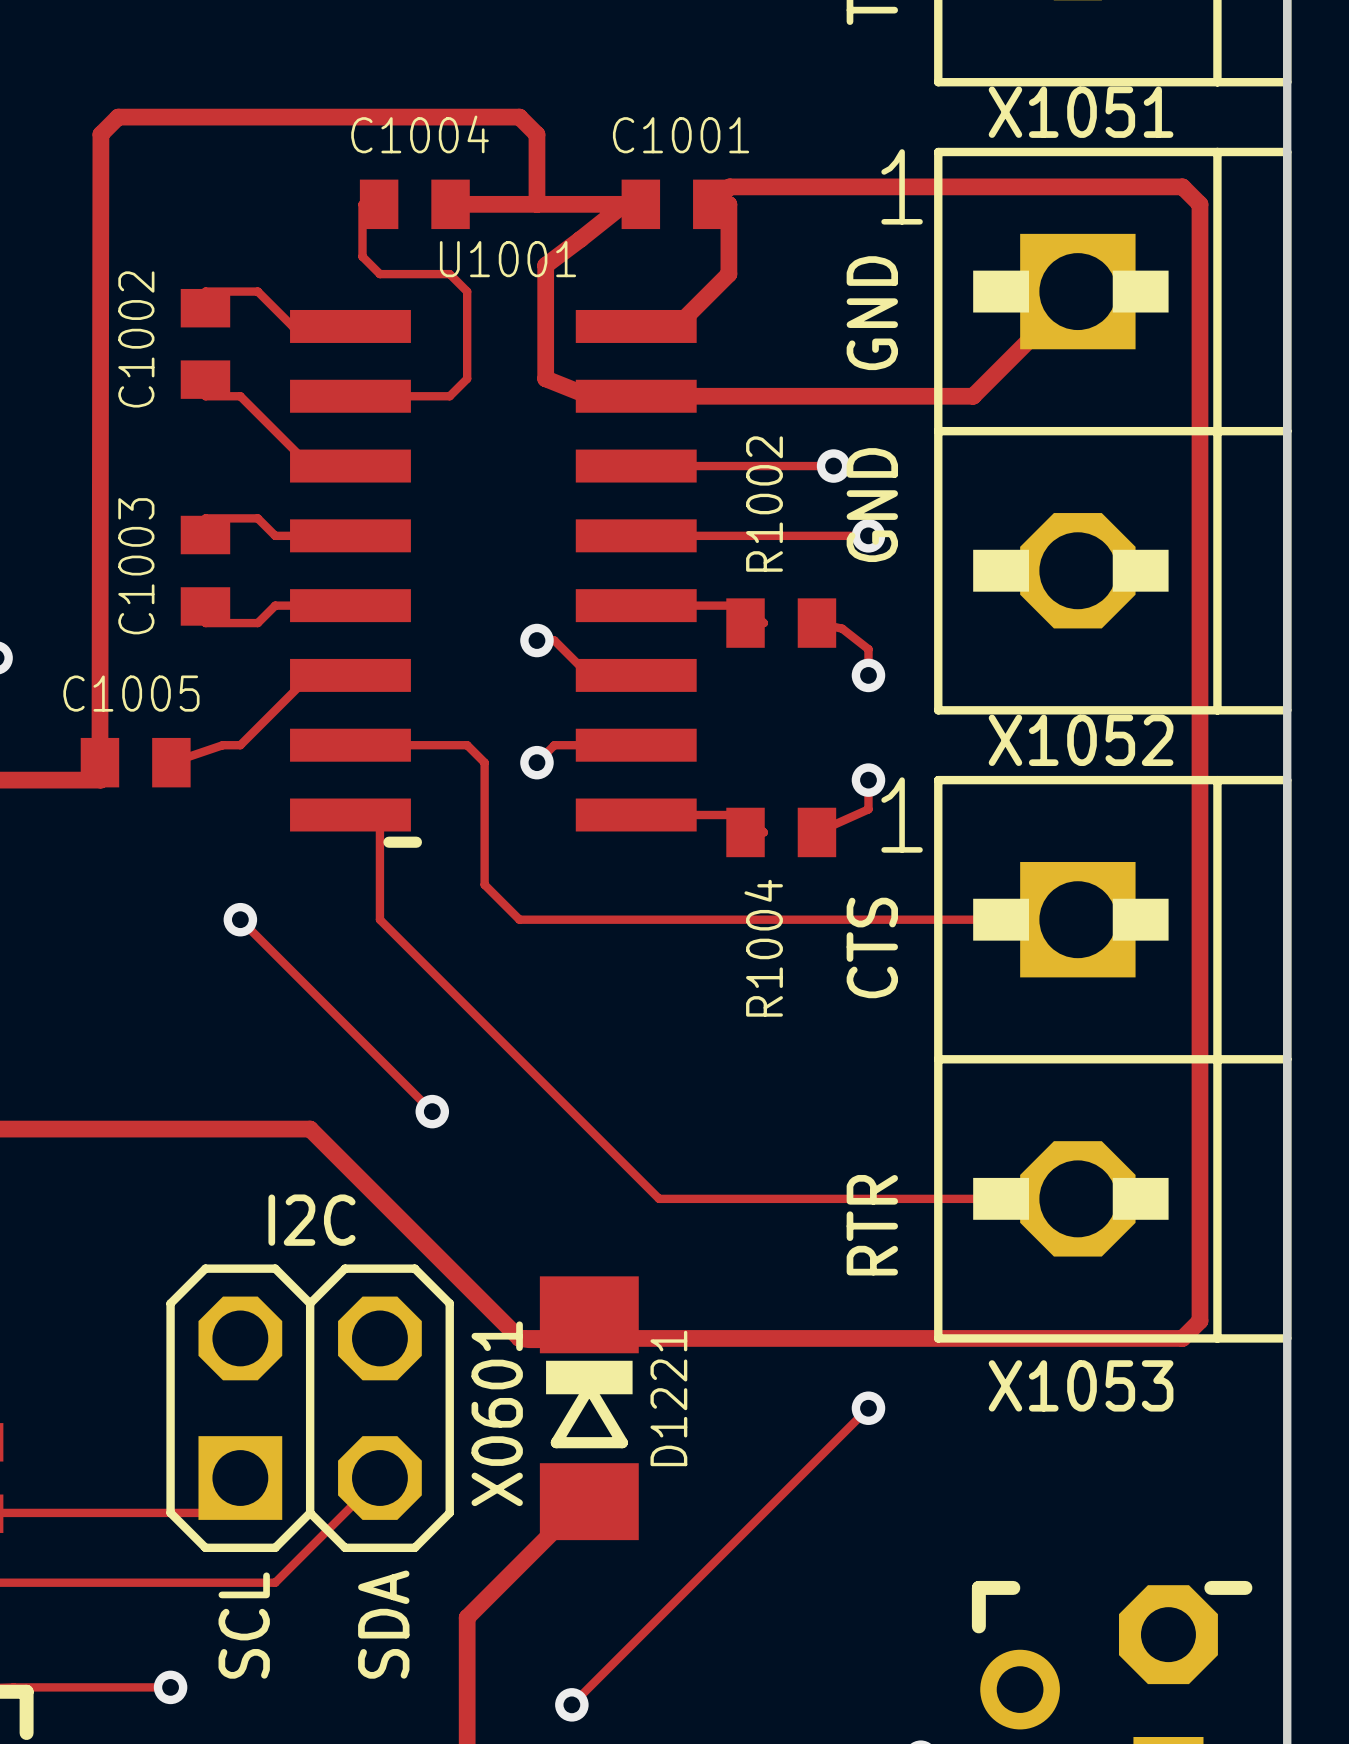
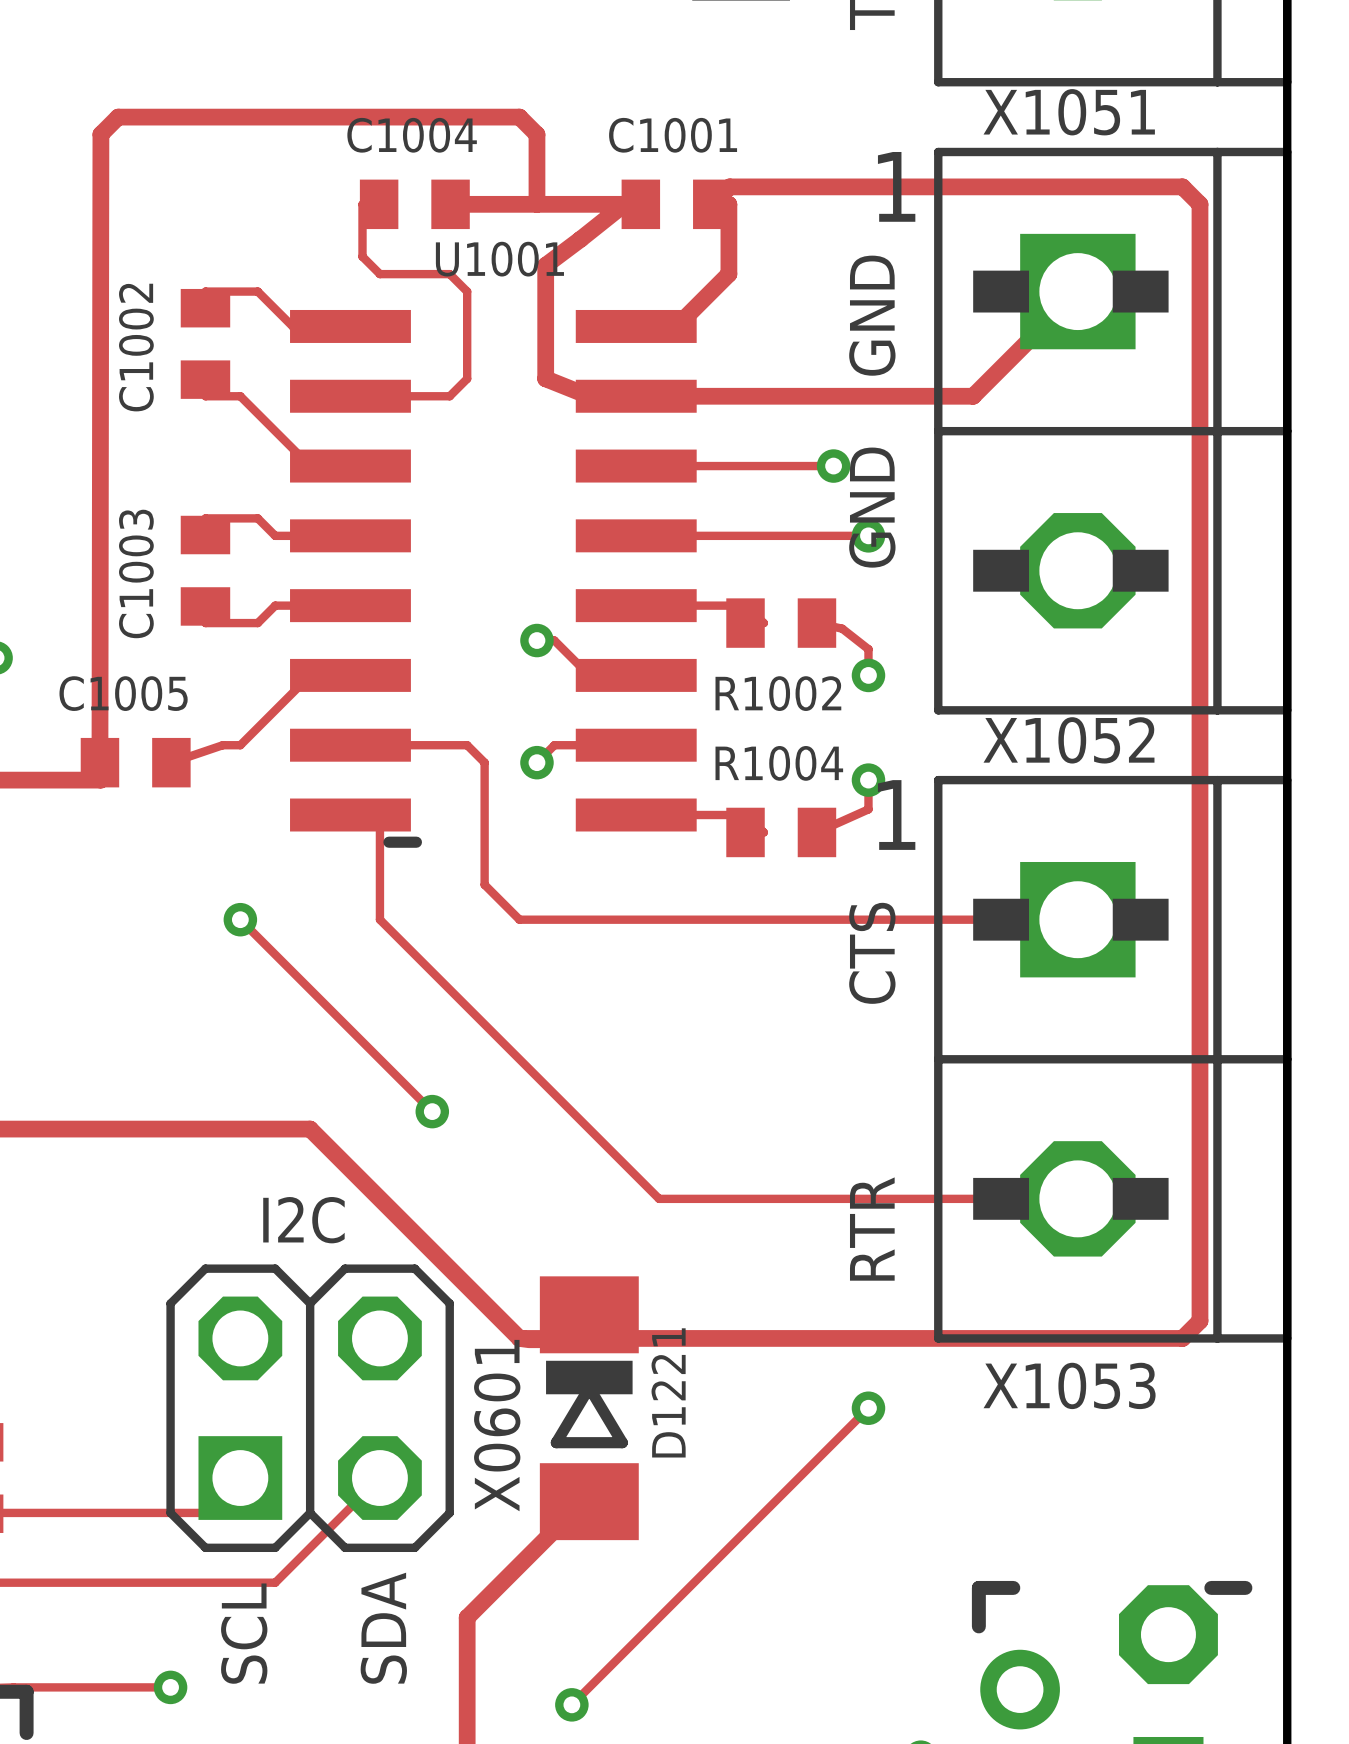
R1002 name rotation: 0° (764, 504) -> 90° clockwise (778, 693)
R1002 name position: R1002 (764, 504) -> R1002 (778, 693)
R1004 name rotation: 0° (763, 948) -> 90° clockwise (779, 763)
R1004 name position: R1004 (763, 948) -> R1004 (779, 763)

